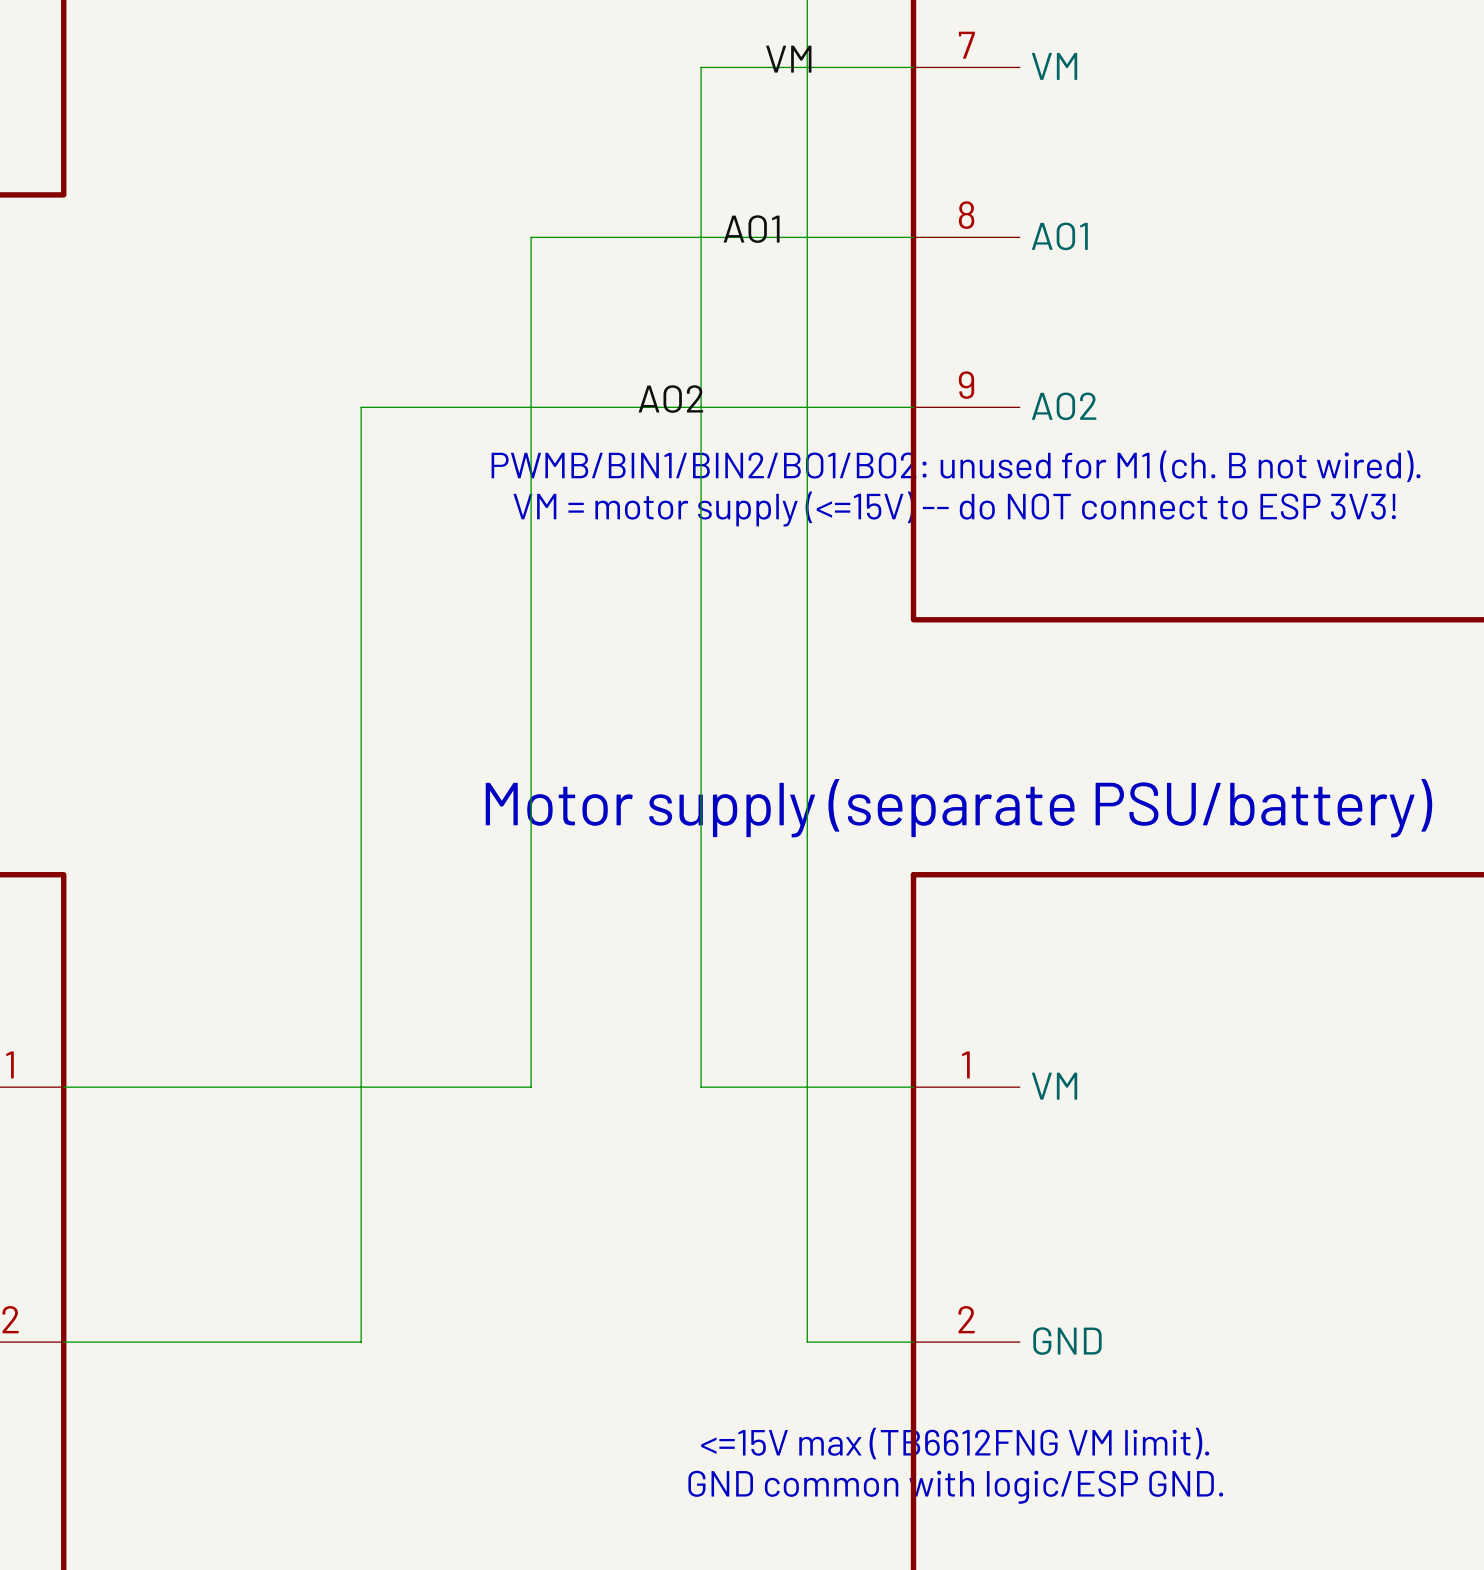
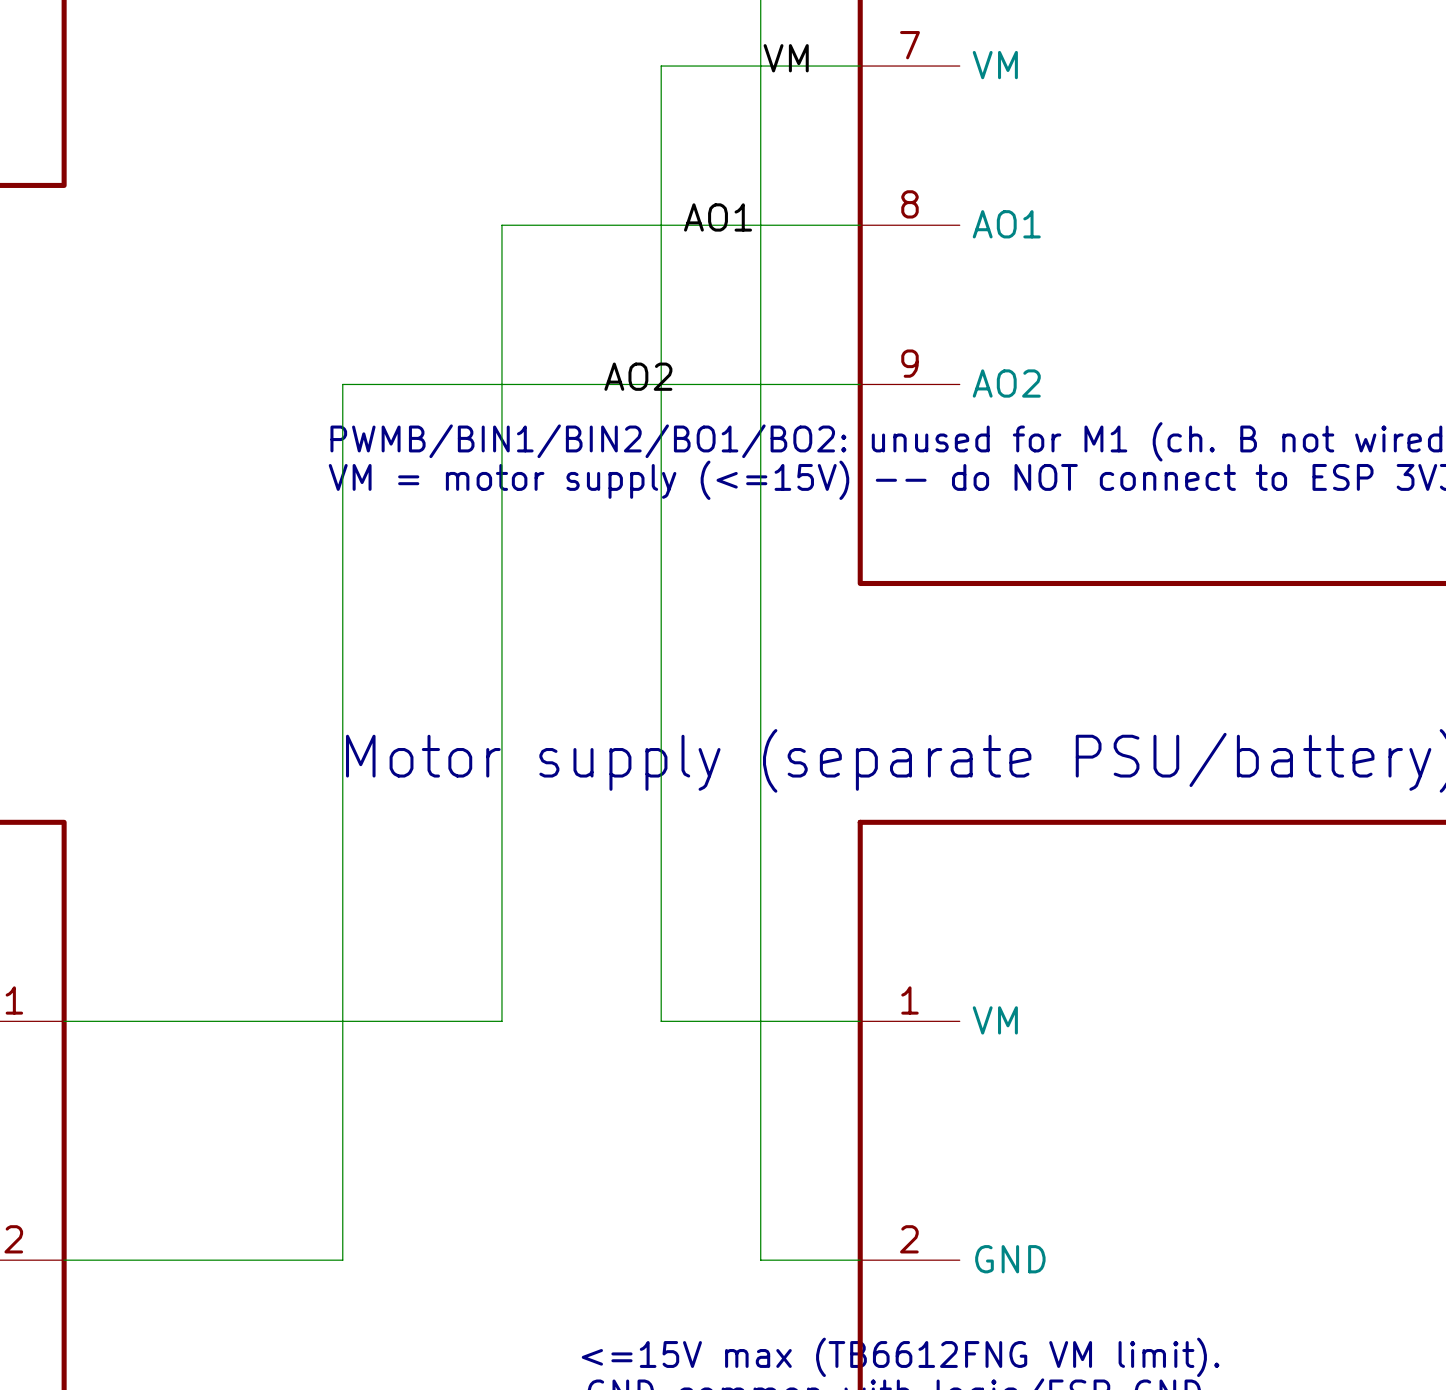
label position: VM (788, 59) -> VM (786, 58)

